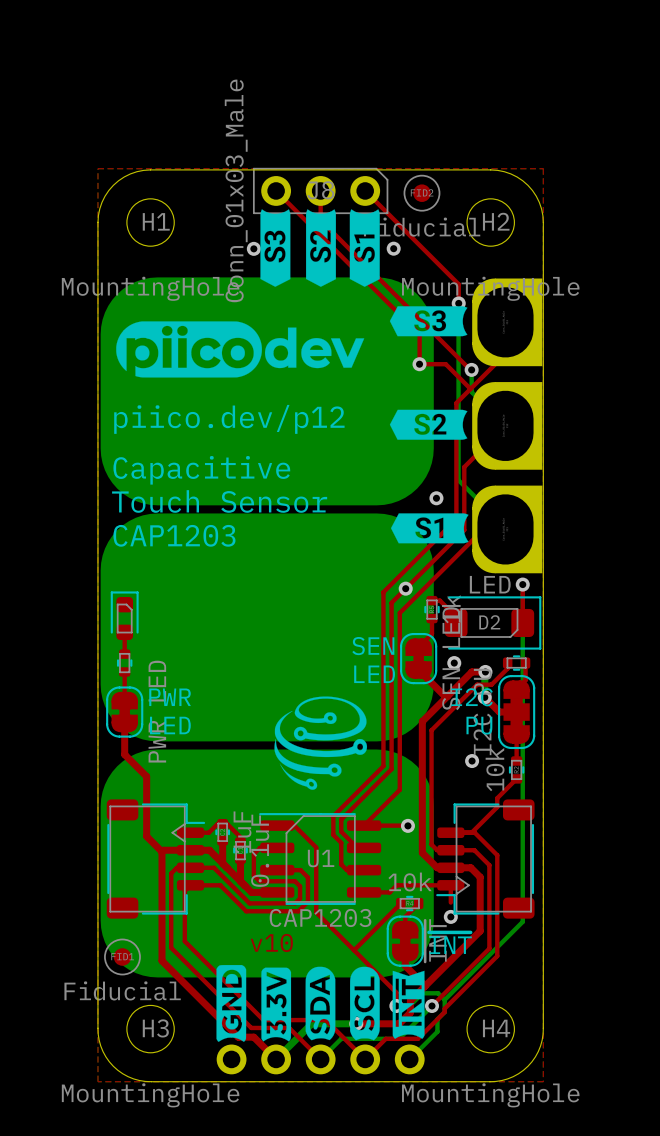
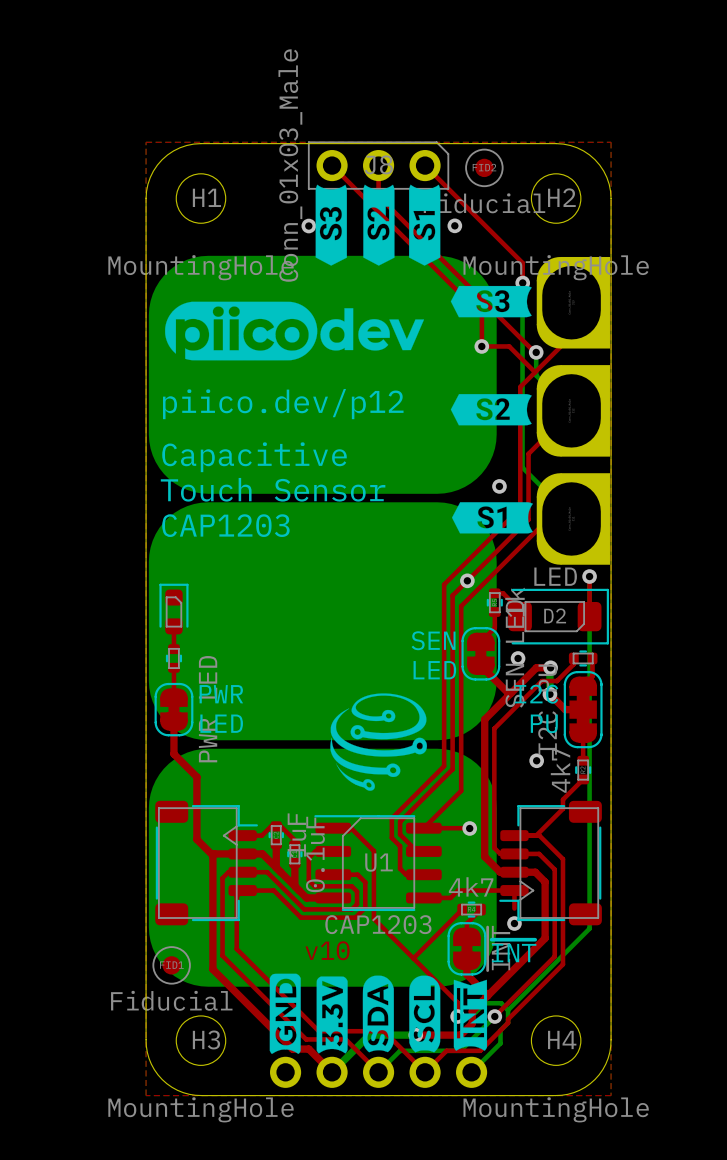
part value: 10k (495, 769) -> 4k7 (560, 770)
part value: 10k (410, 882) -> 4k7 (471, 886)

